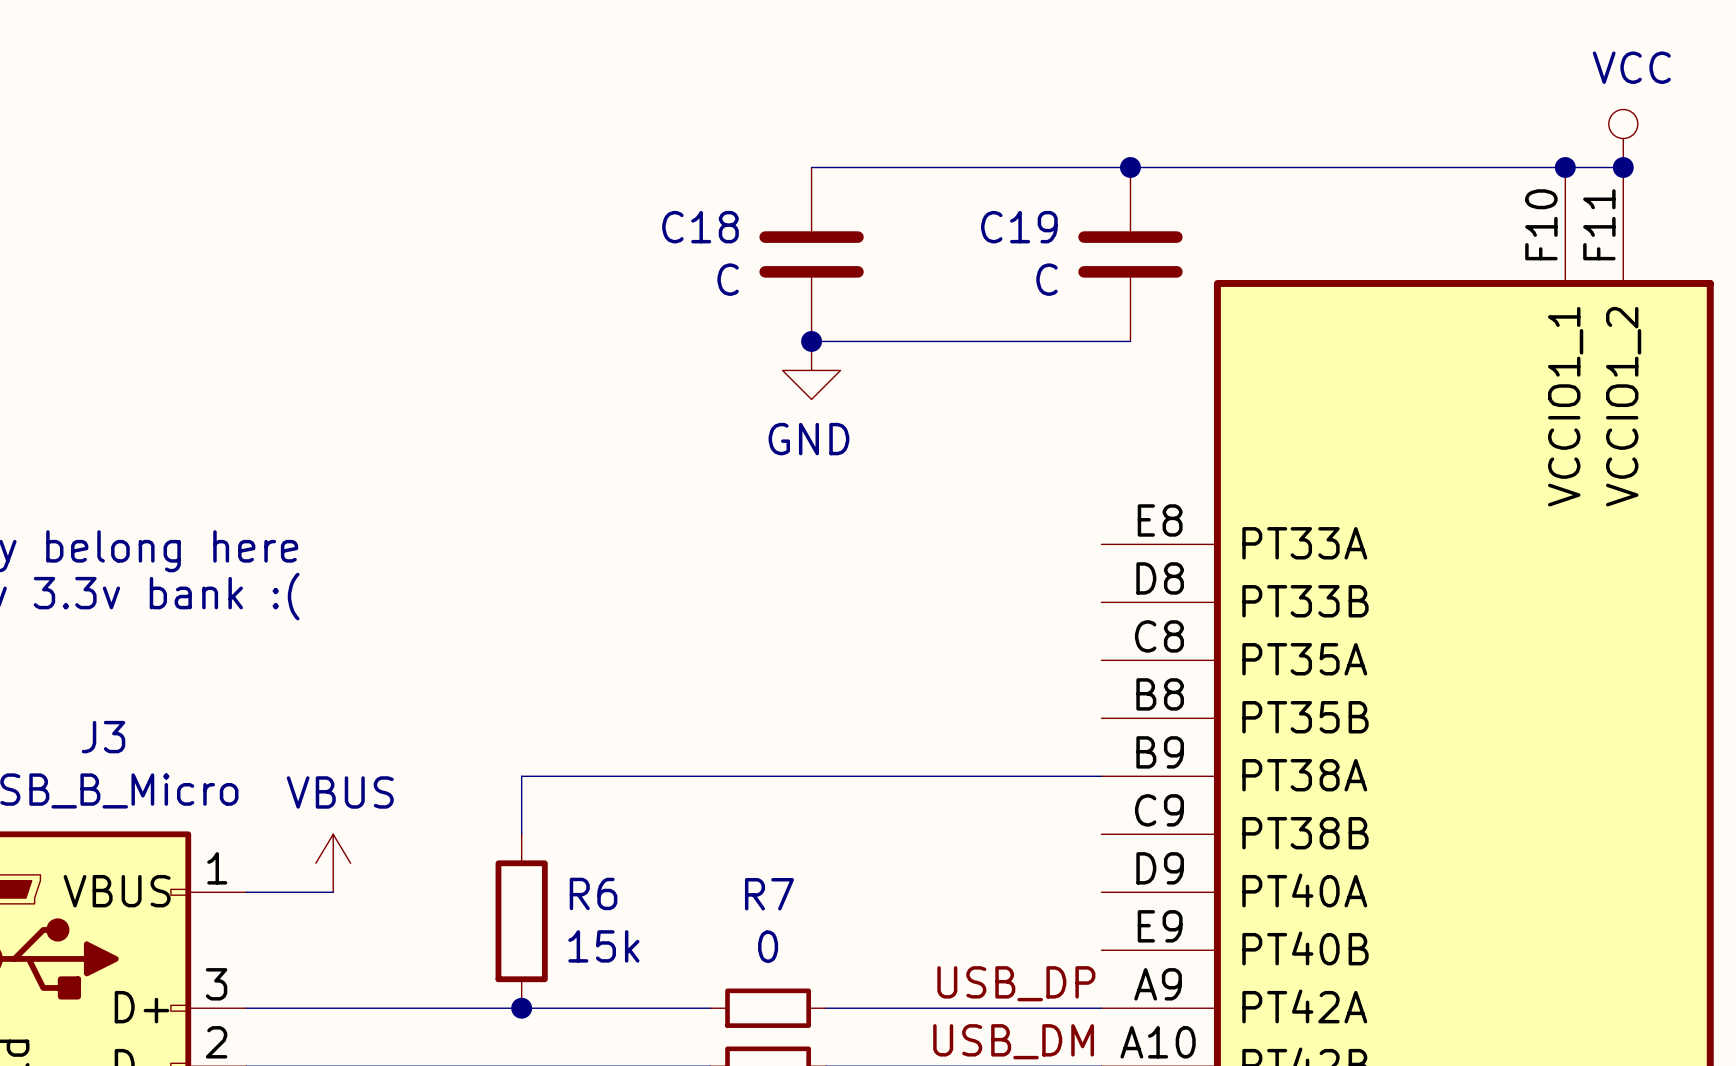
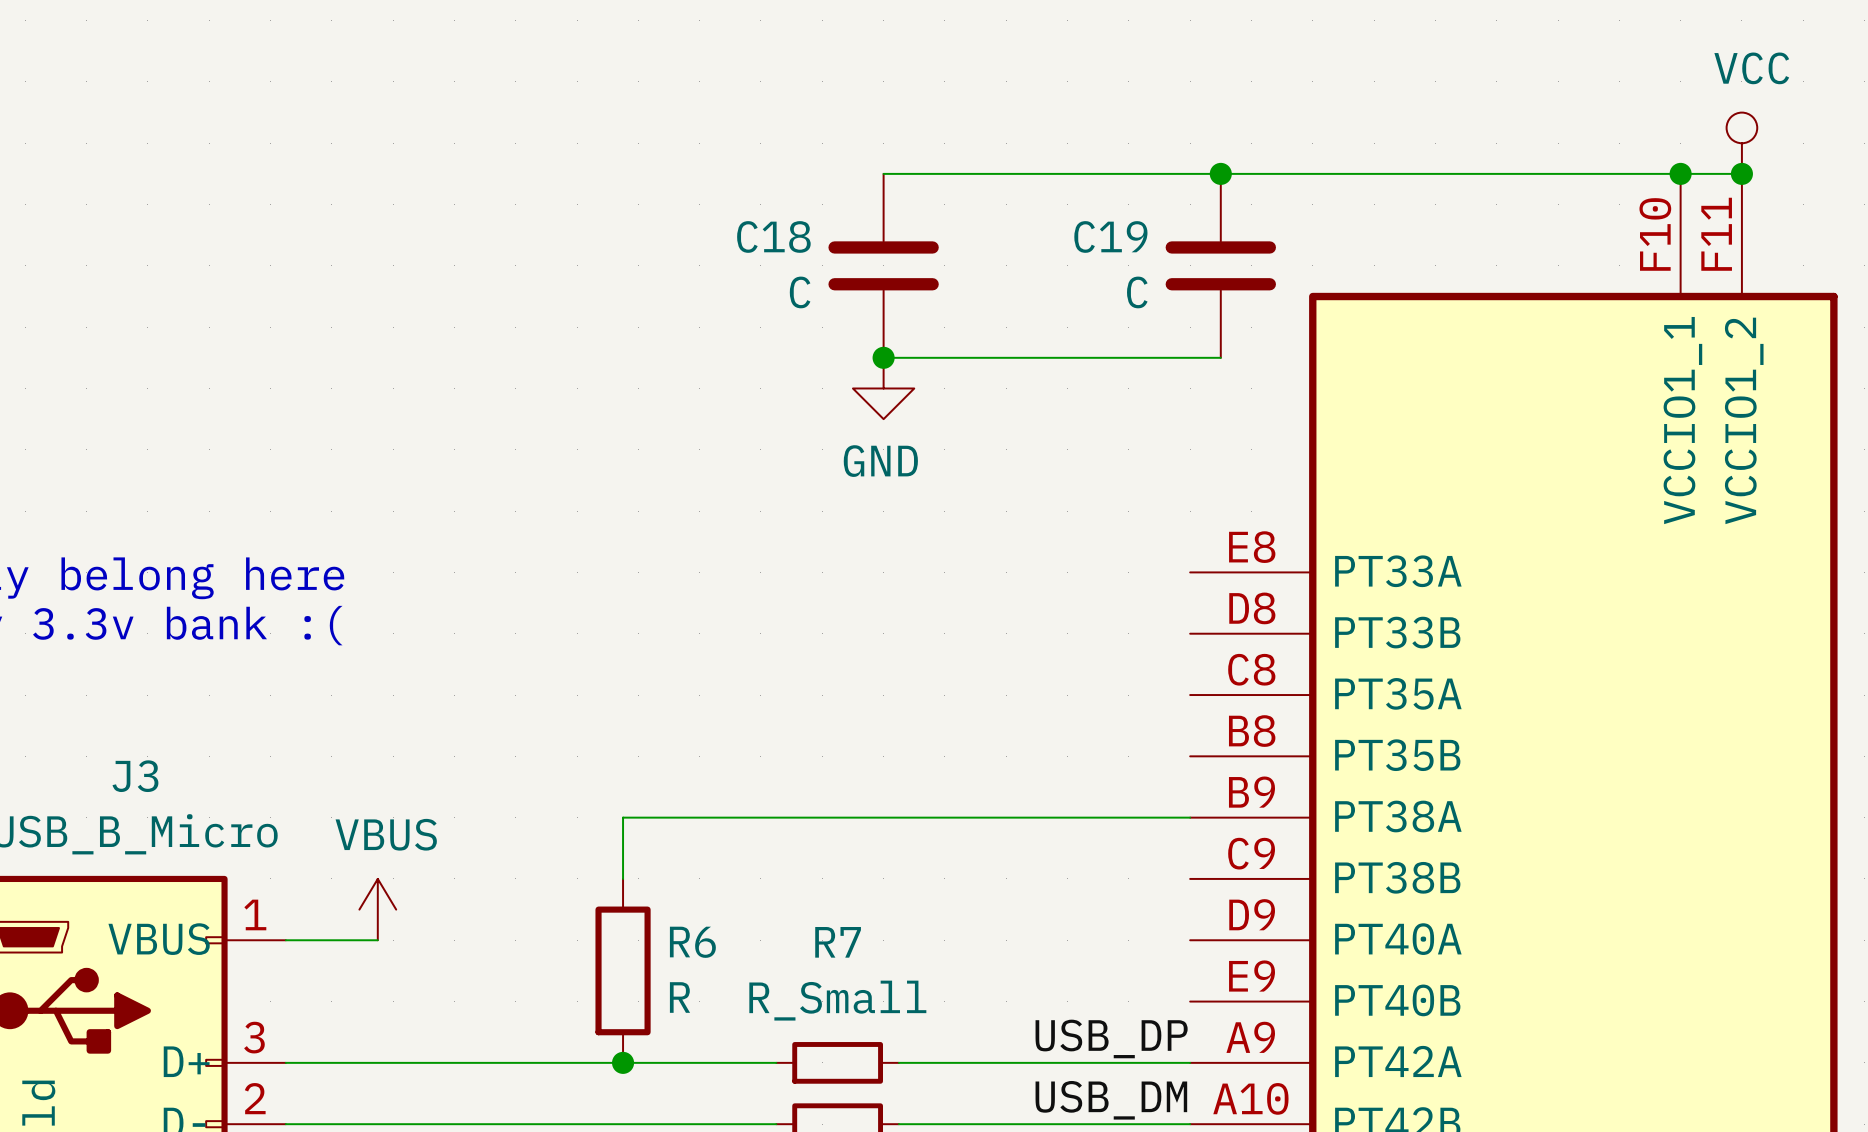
wire: (565, 776) (521, 776) (521, 834) -> (623, 817) (623, 878)
R6 position: (521, 921) -> (623, 970)
R6 value: 15k (603, 946) -> R (680, 997)
R7 value: 0 (768, 946) -> R_Small (837, 1000)
junction position: (521, 1008) -> (623, 1062)

